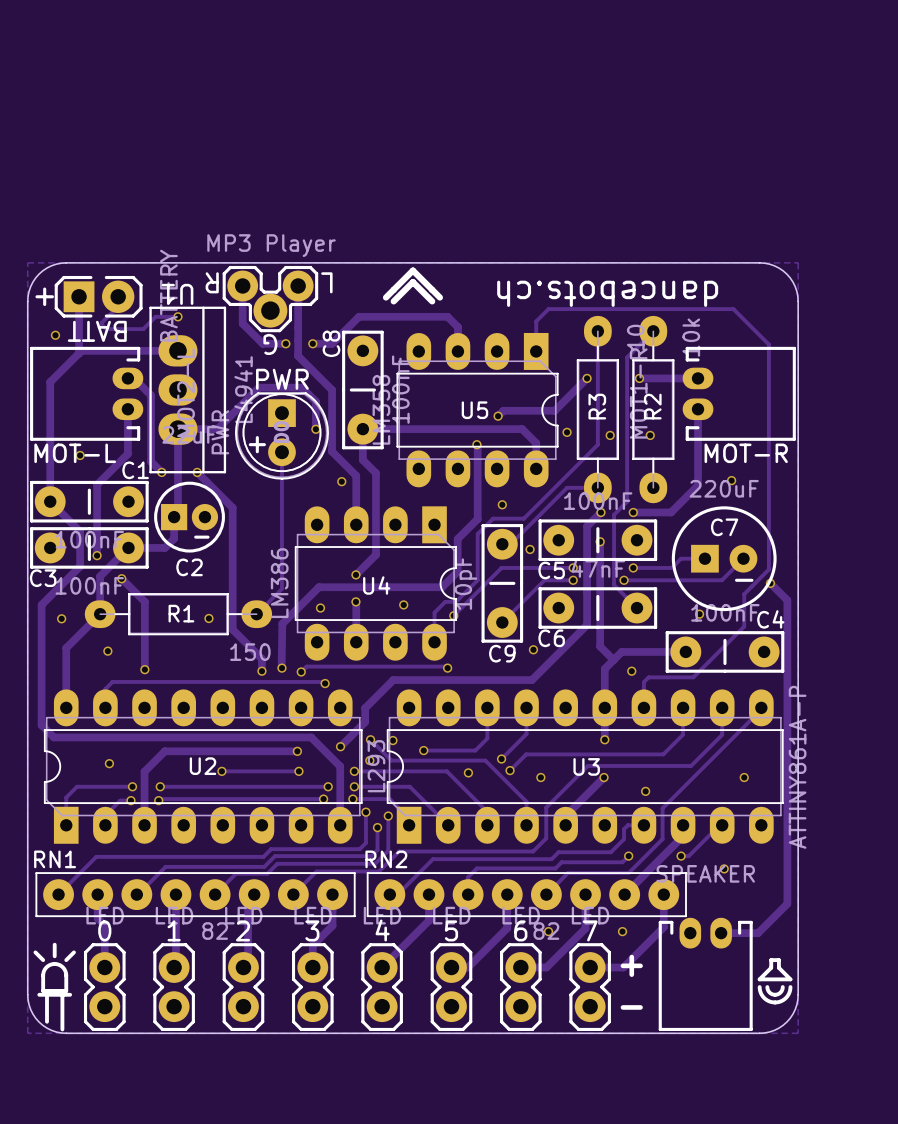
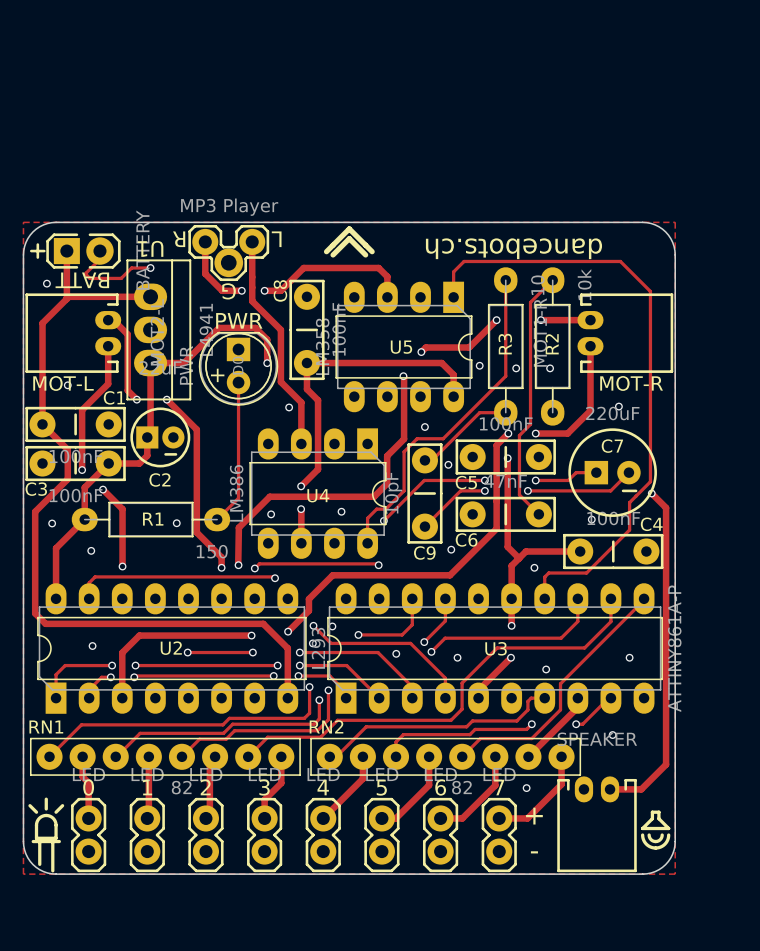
via: (548, 931) -> none

